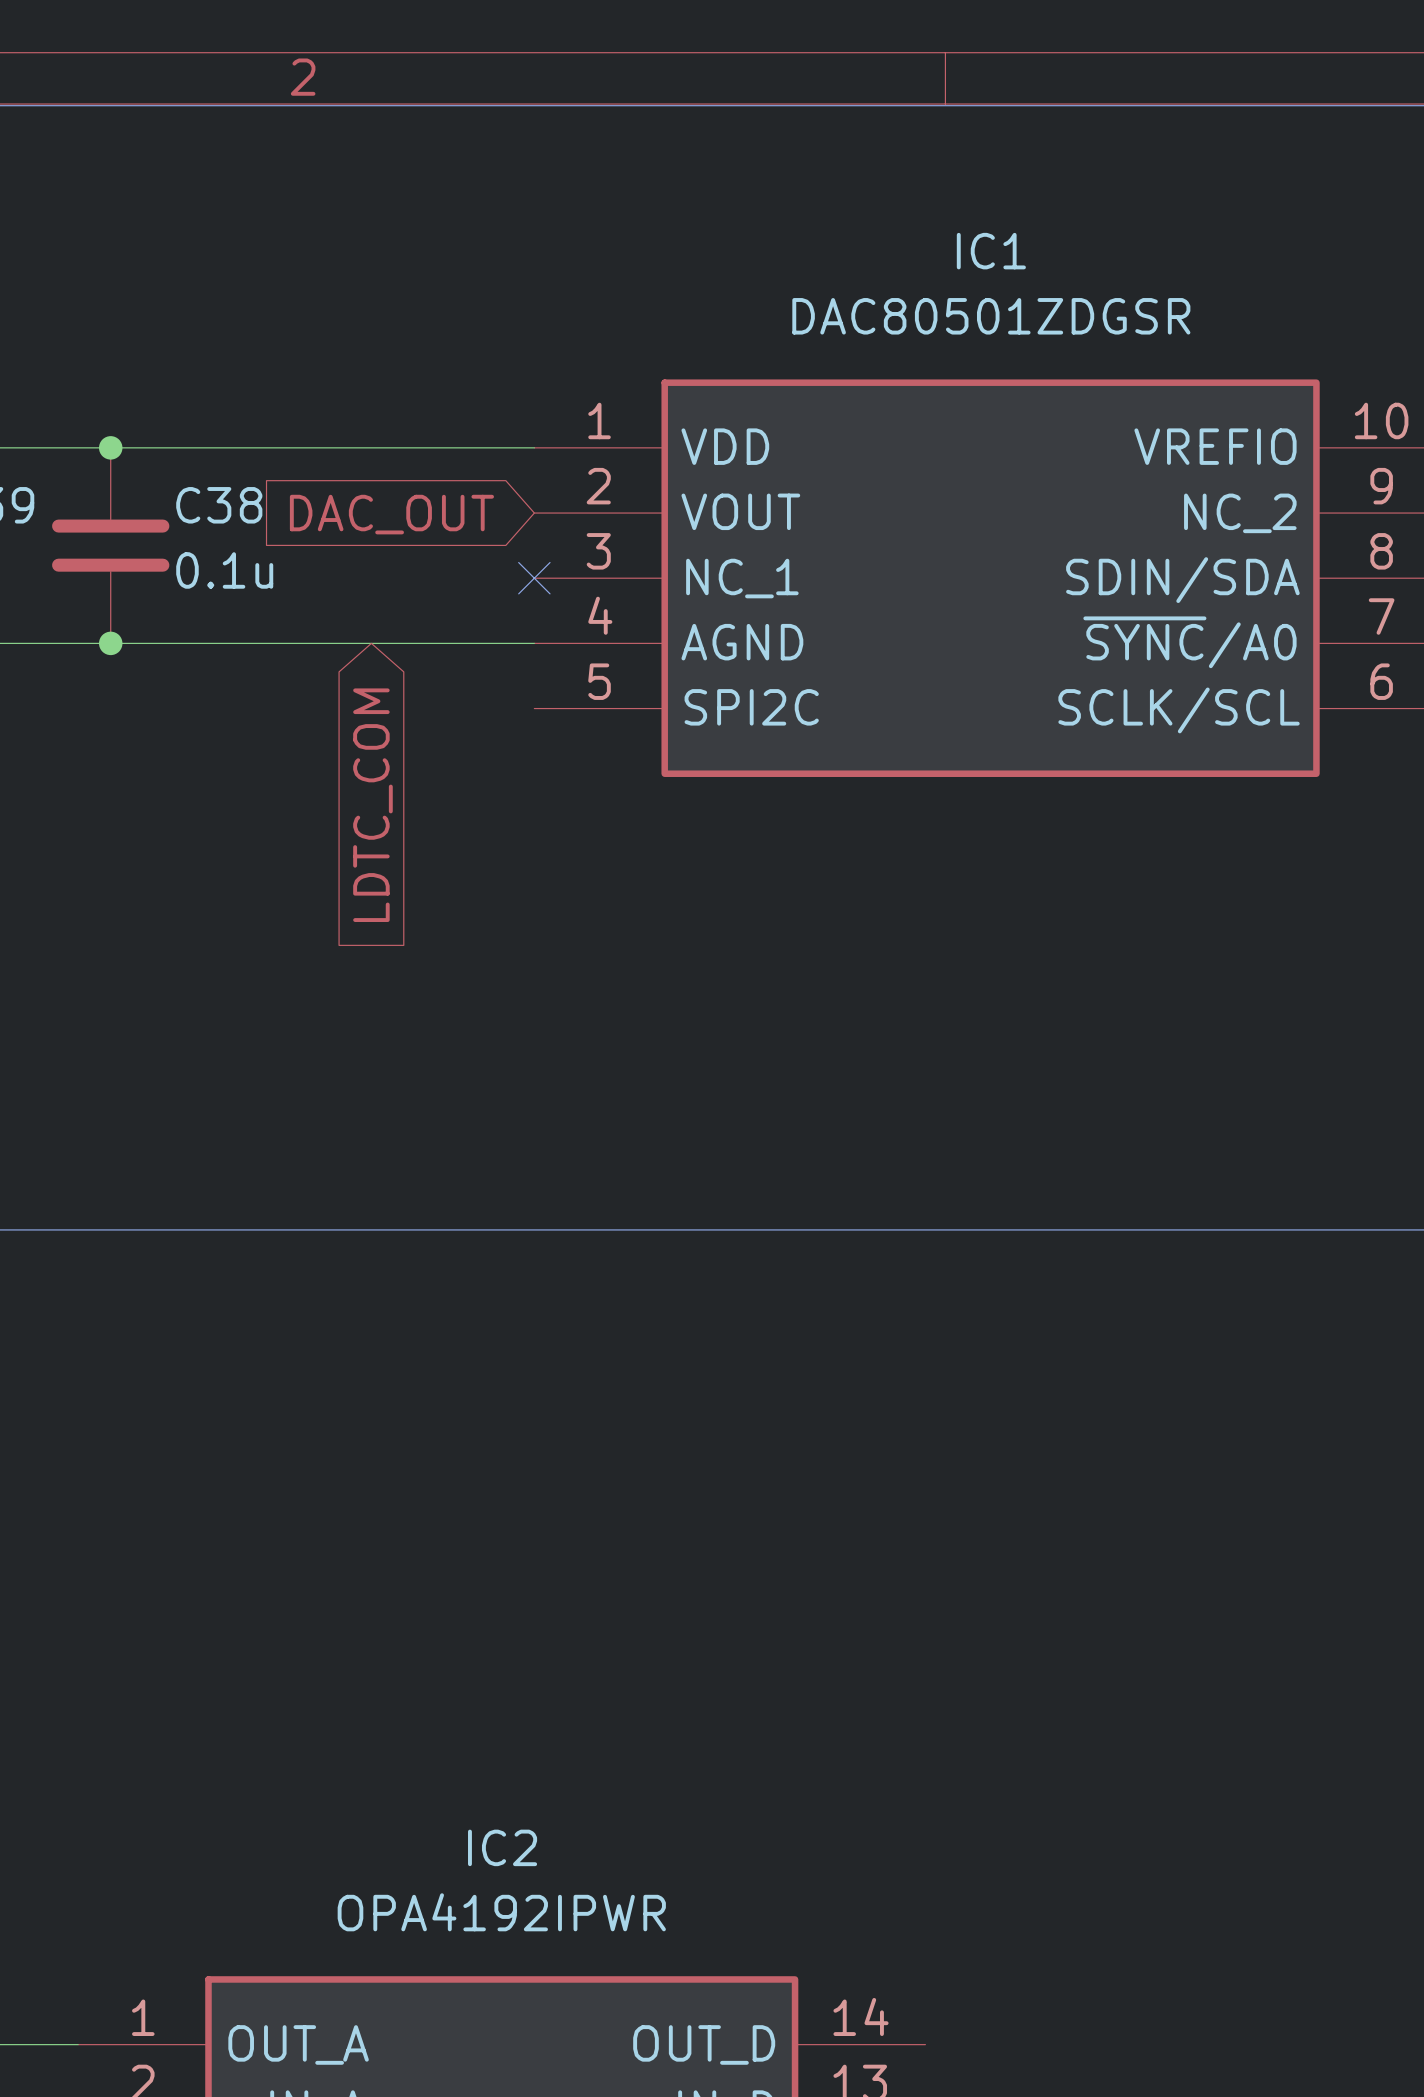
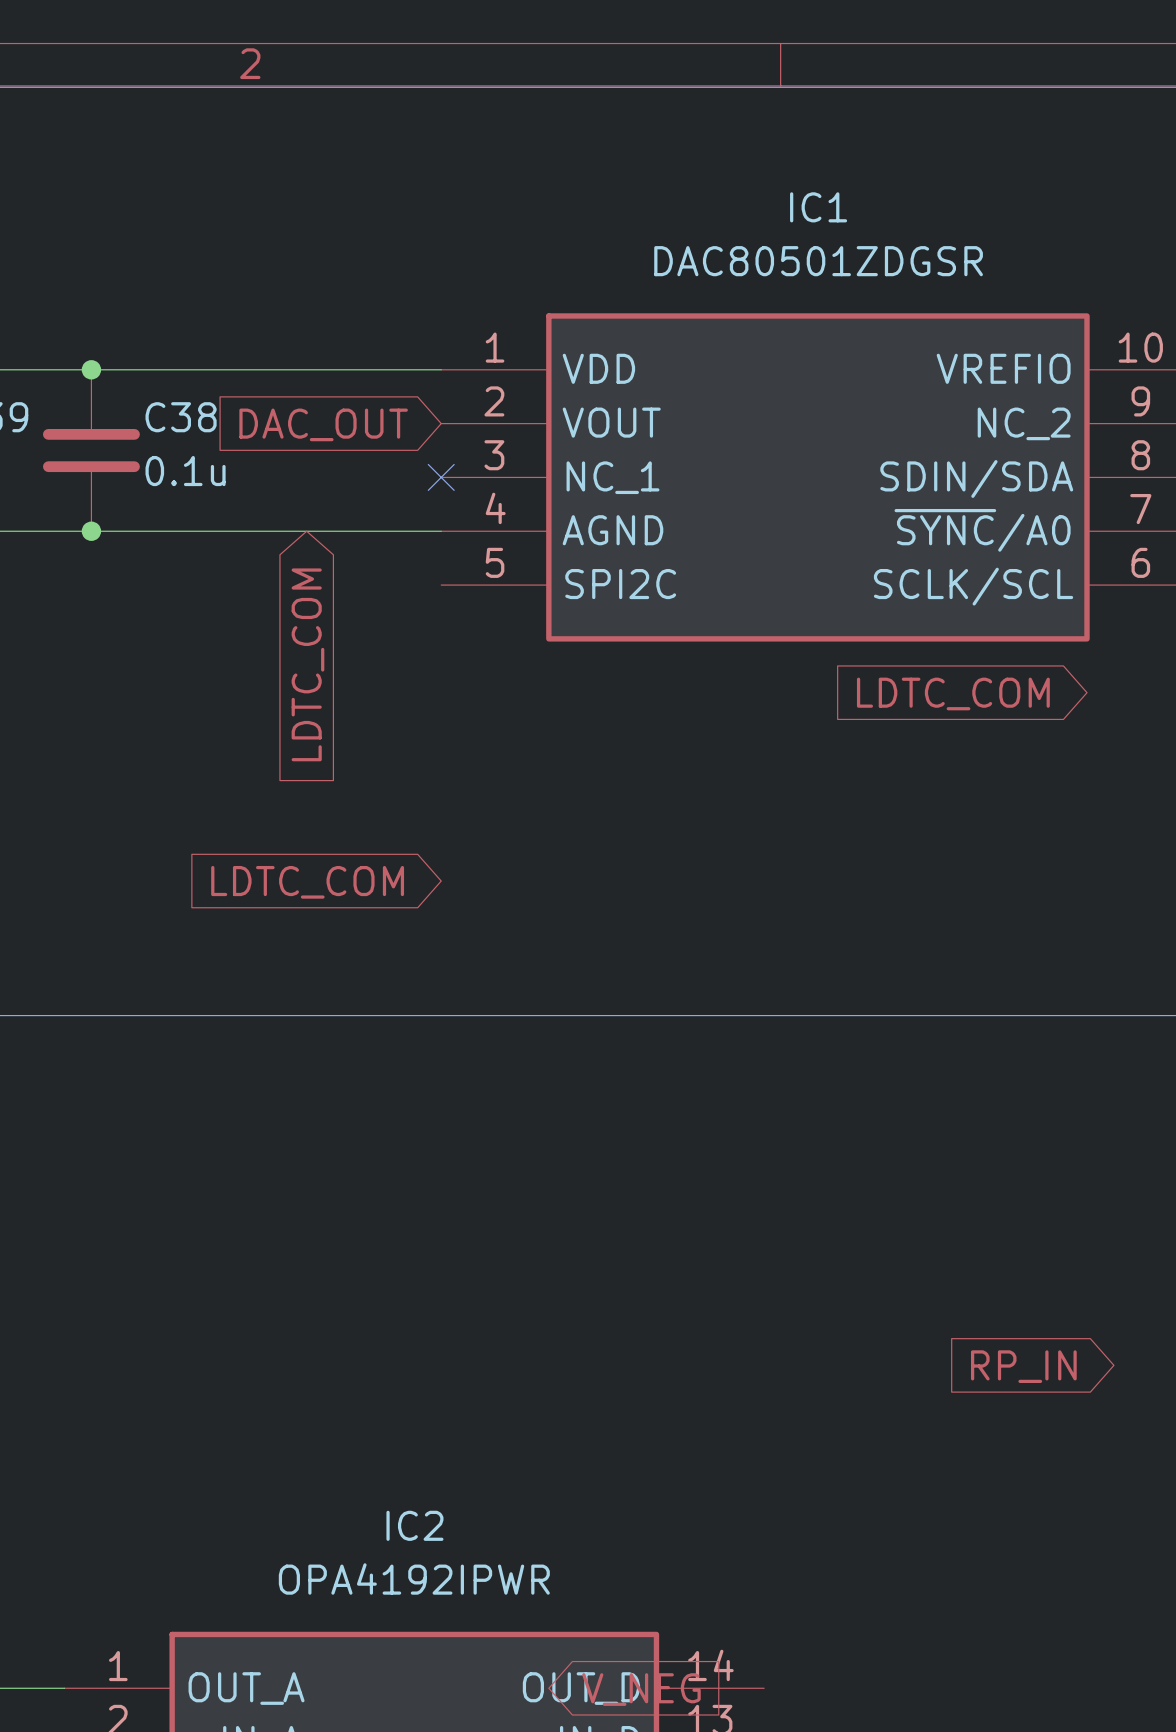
global label: none -> LDTC_COM (953, 693)
global label: none -> LDTC_COM (307, 882)
global label: none -> RP_IN (1023, 1366)
global label: none -> V_NEG (641, 1689)

